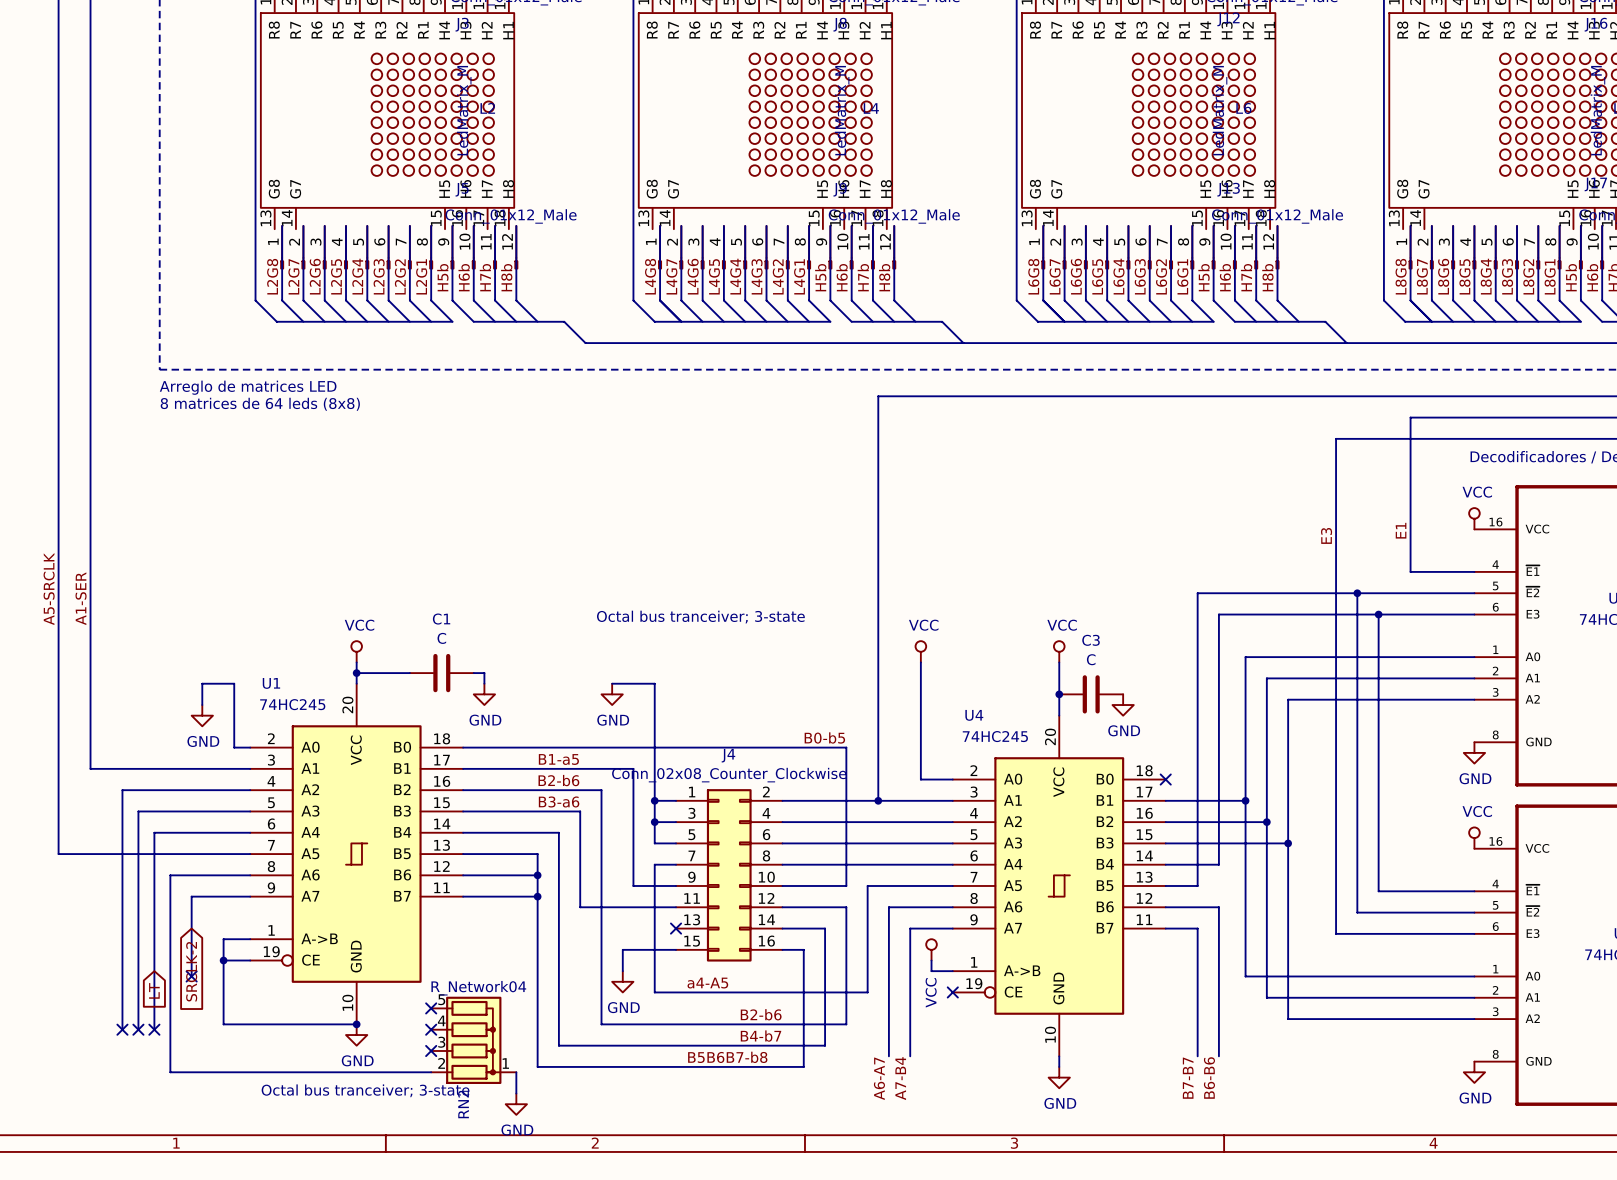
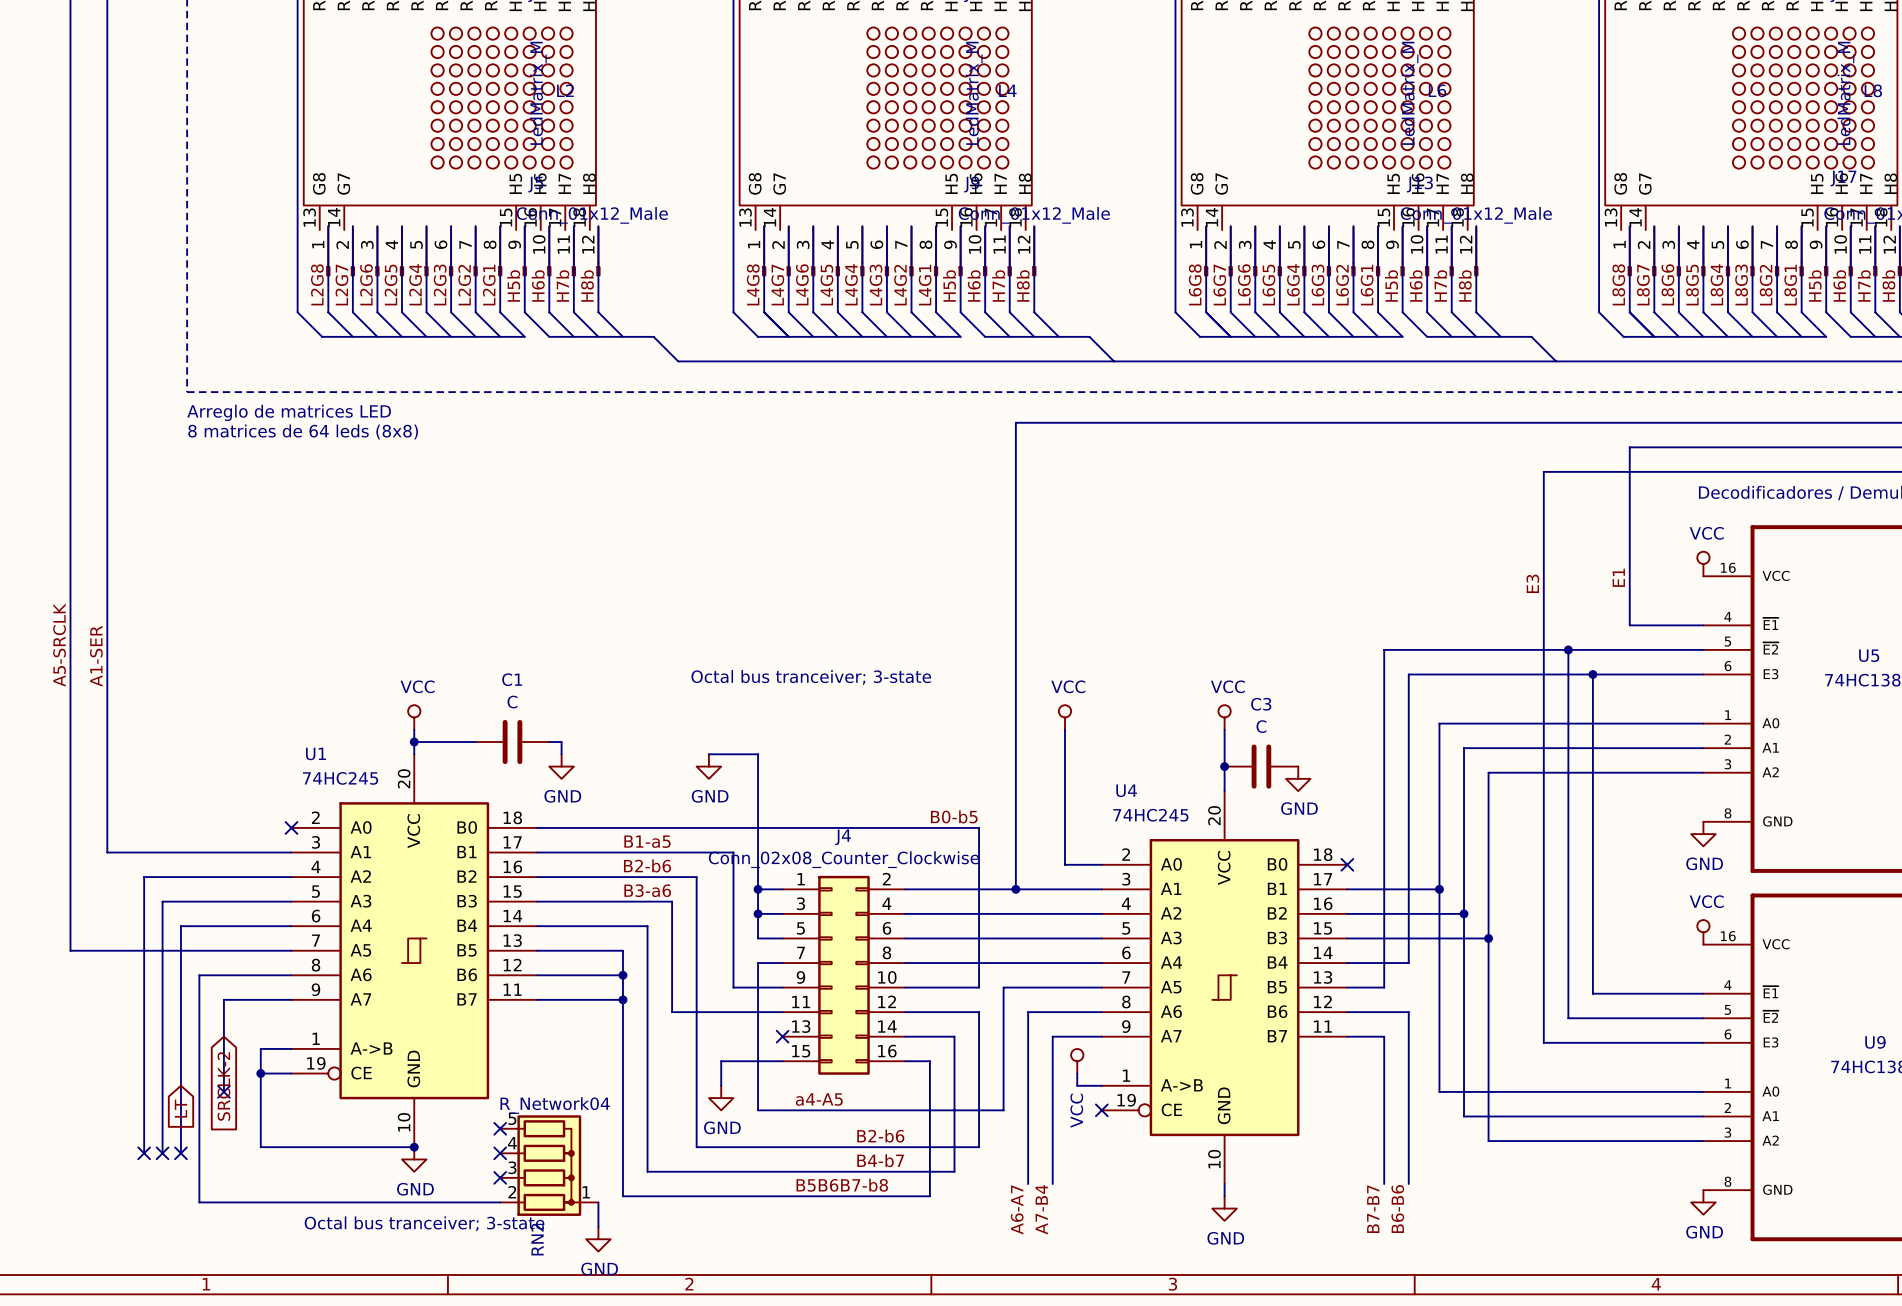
wire: (202, 705) (202, 683) (234, 683) (234, 747) (250, 747) -> none
power symbol: GND (202, 715) -> none
no-connect mark: none -> (291, 827)

